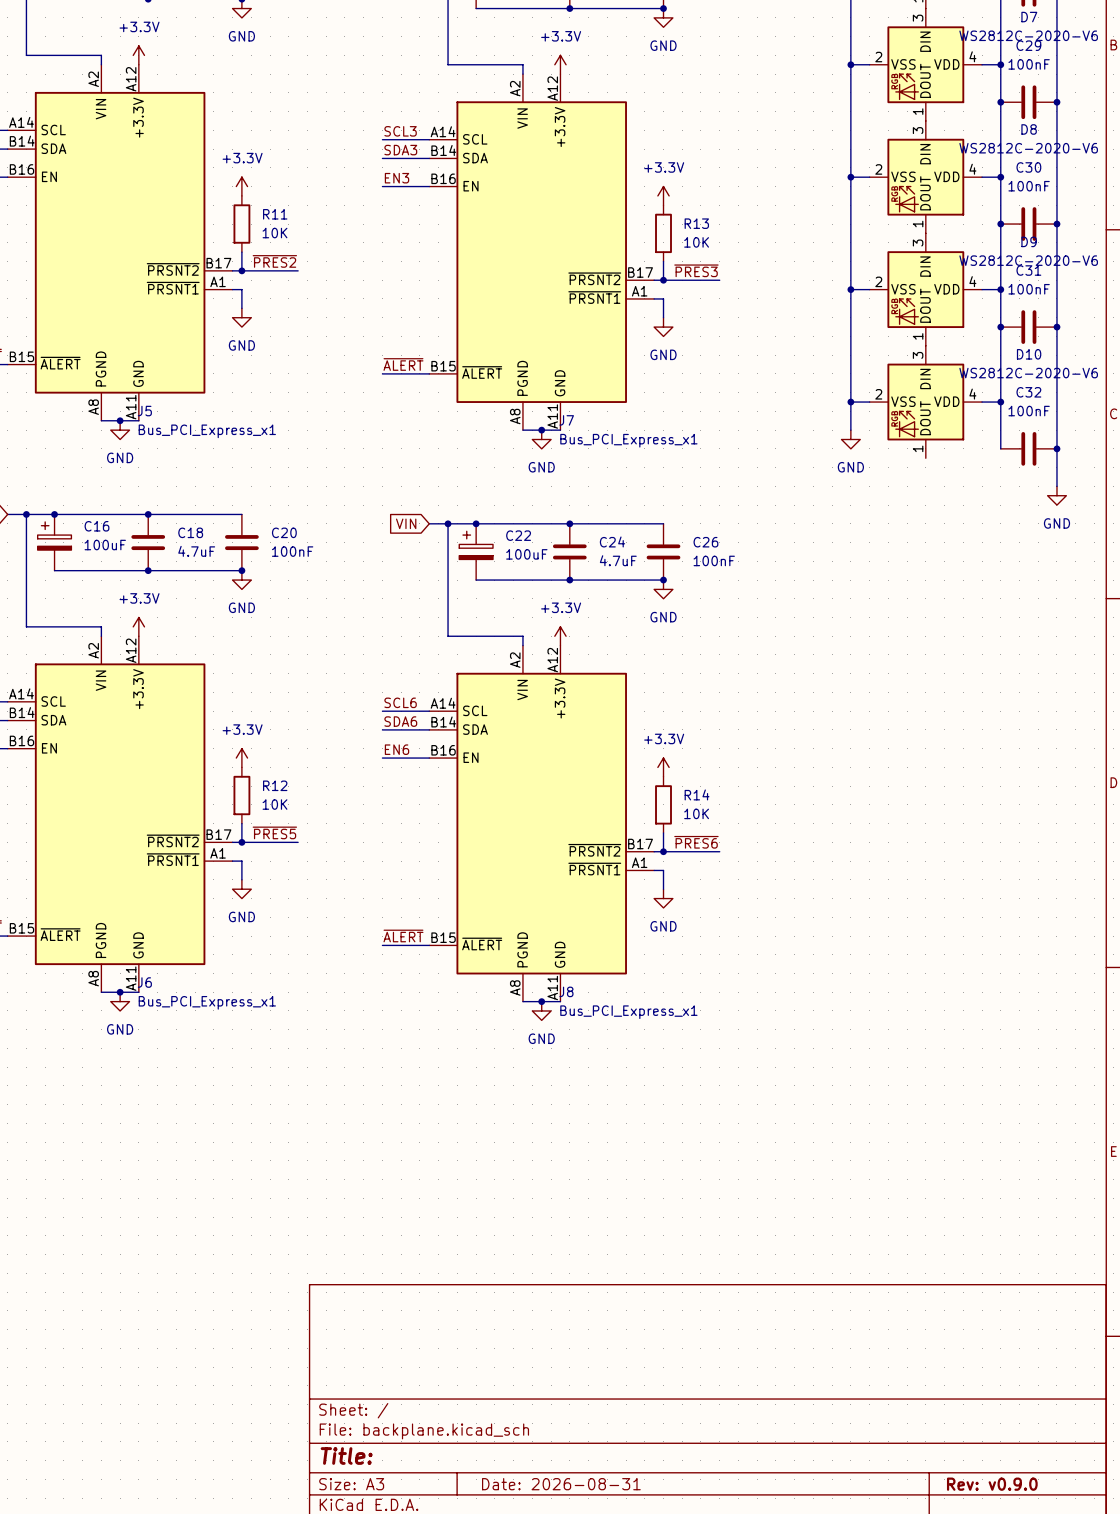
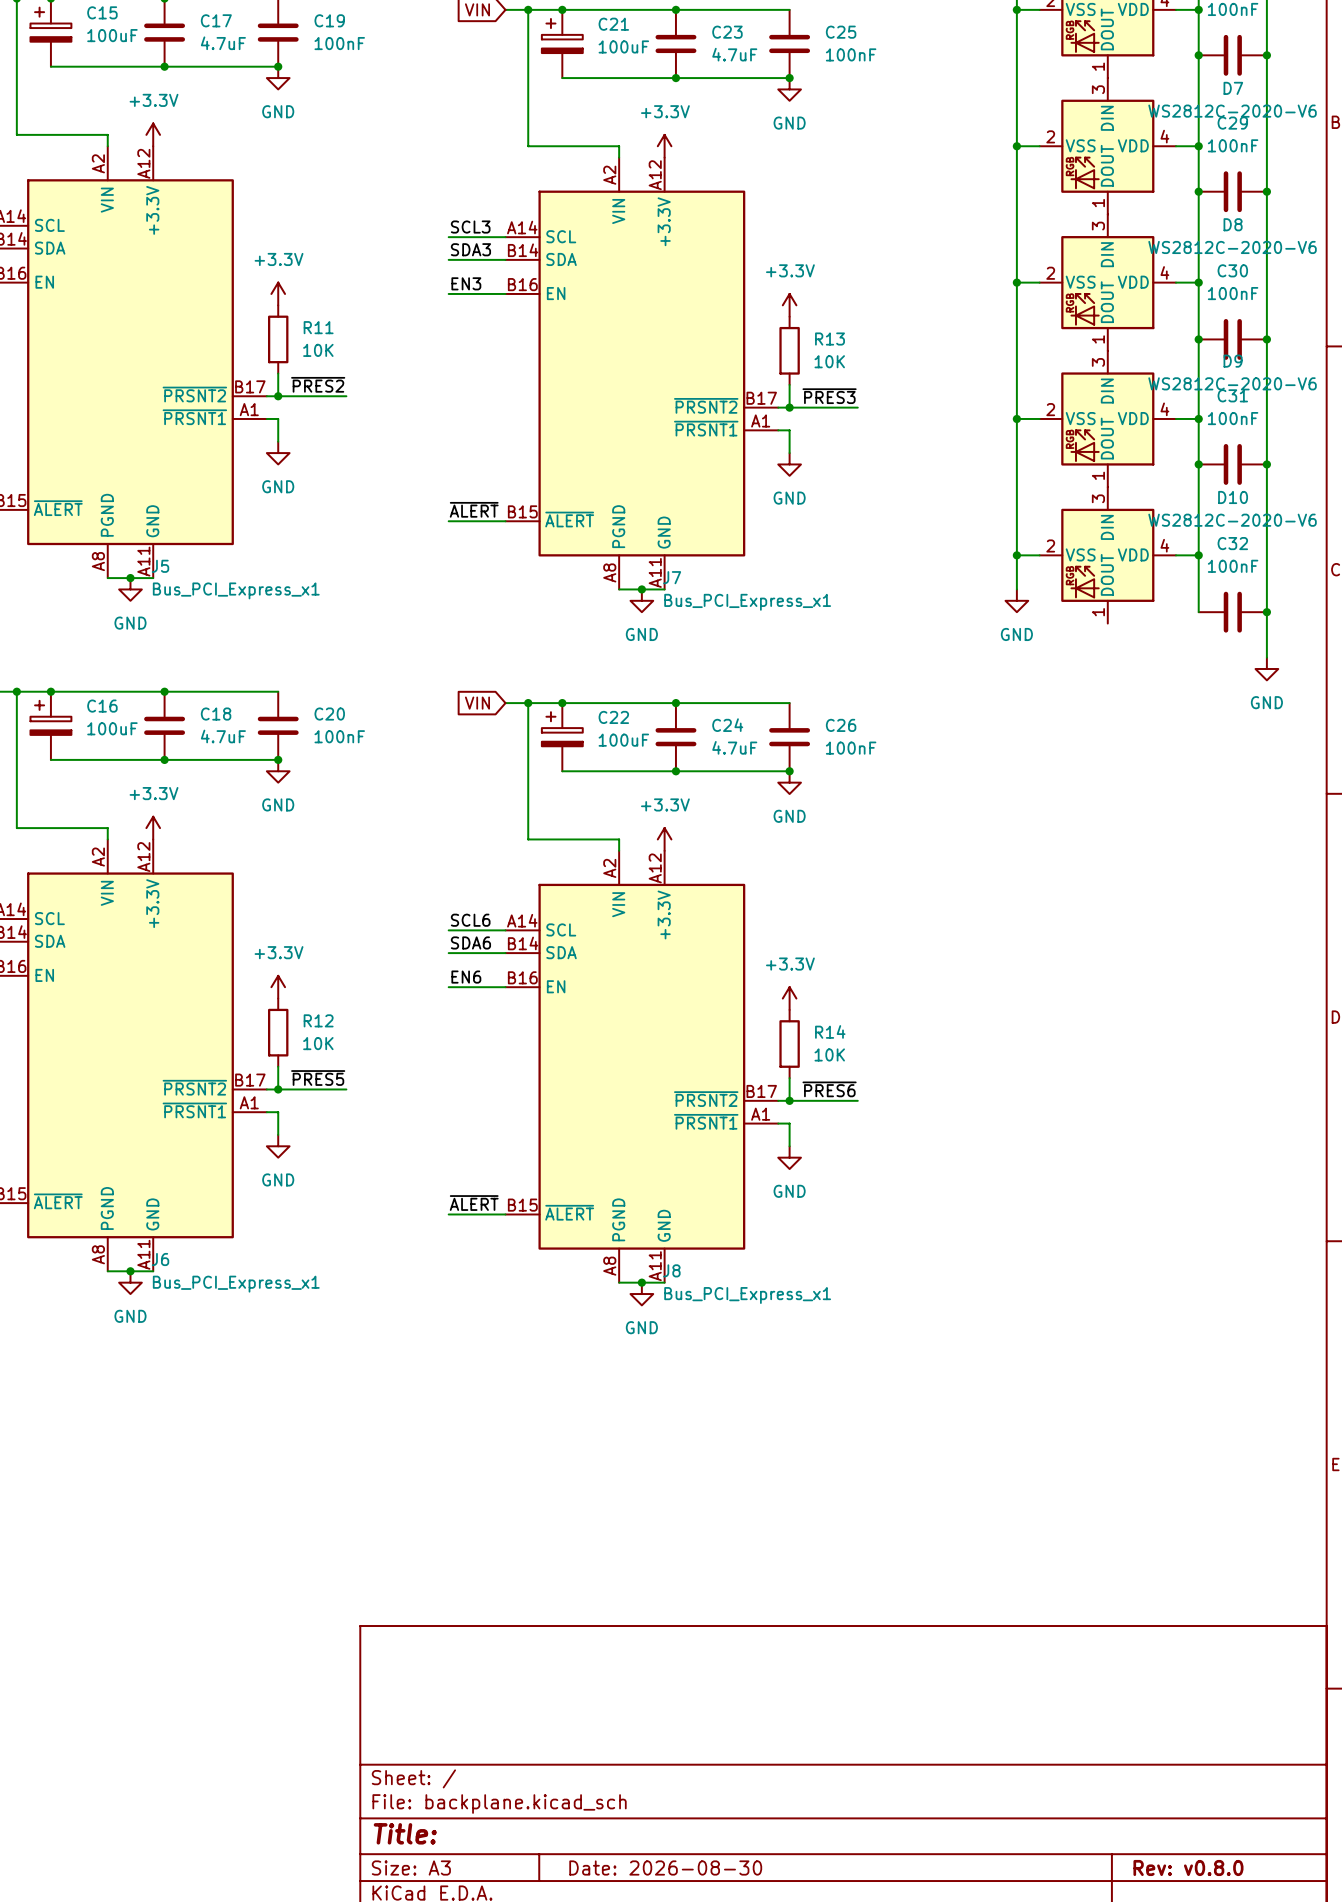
title block: Date: 2026-08-31 (561, 1484) -> Date: 2026-08-30 (665, 1867)
title block: Rev: v0.9.0 (992, 1484) -> Rev: v0.8.0 (1188, 1867)

